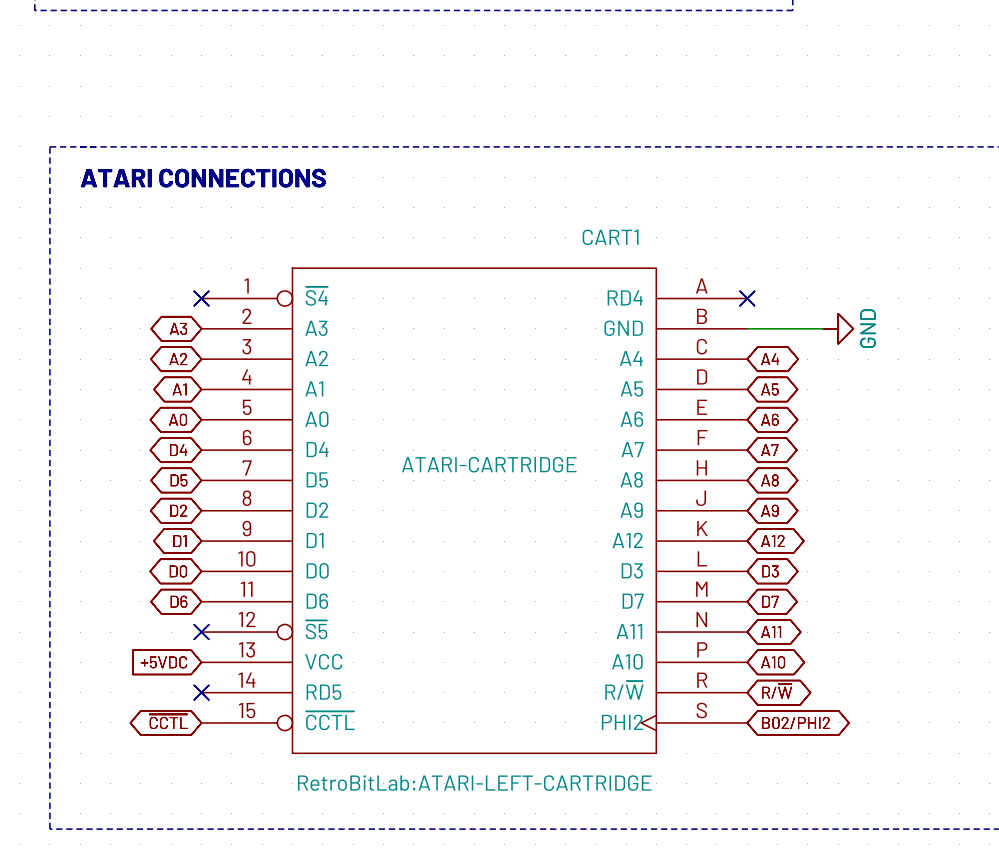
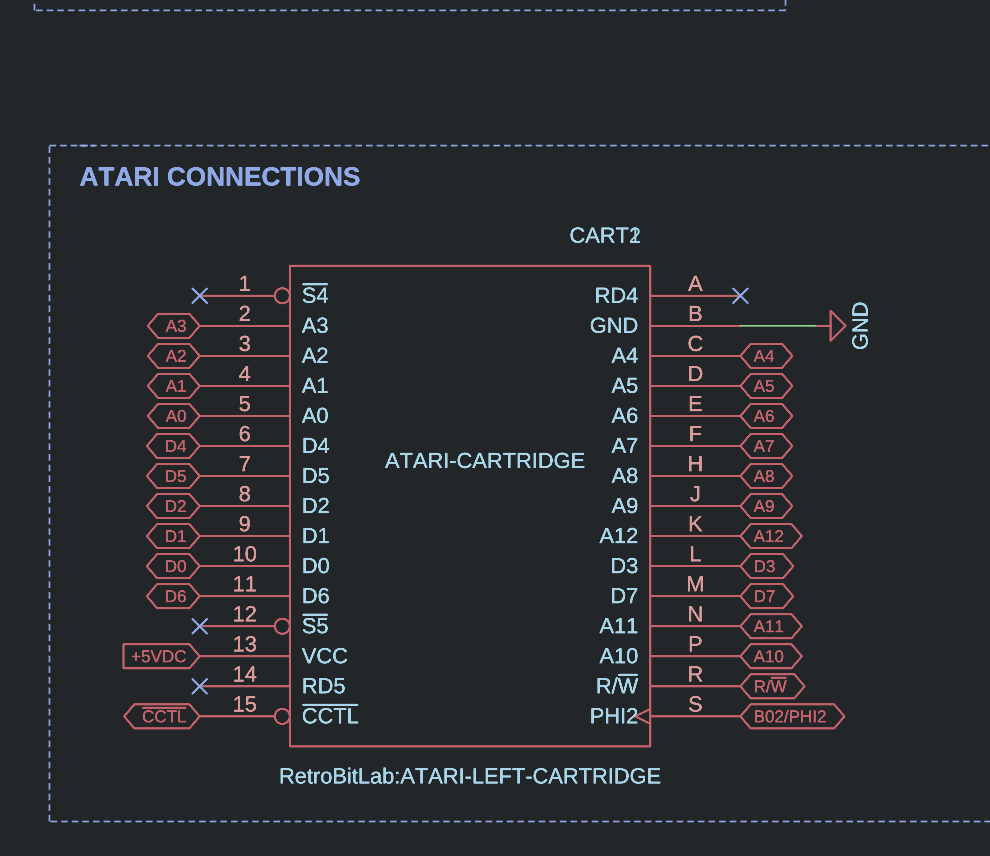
part: none -> ATARI-CARTRIDGE (470, 506)

